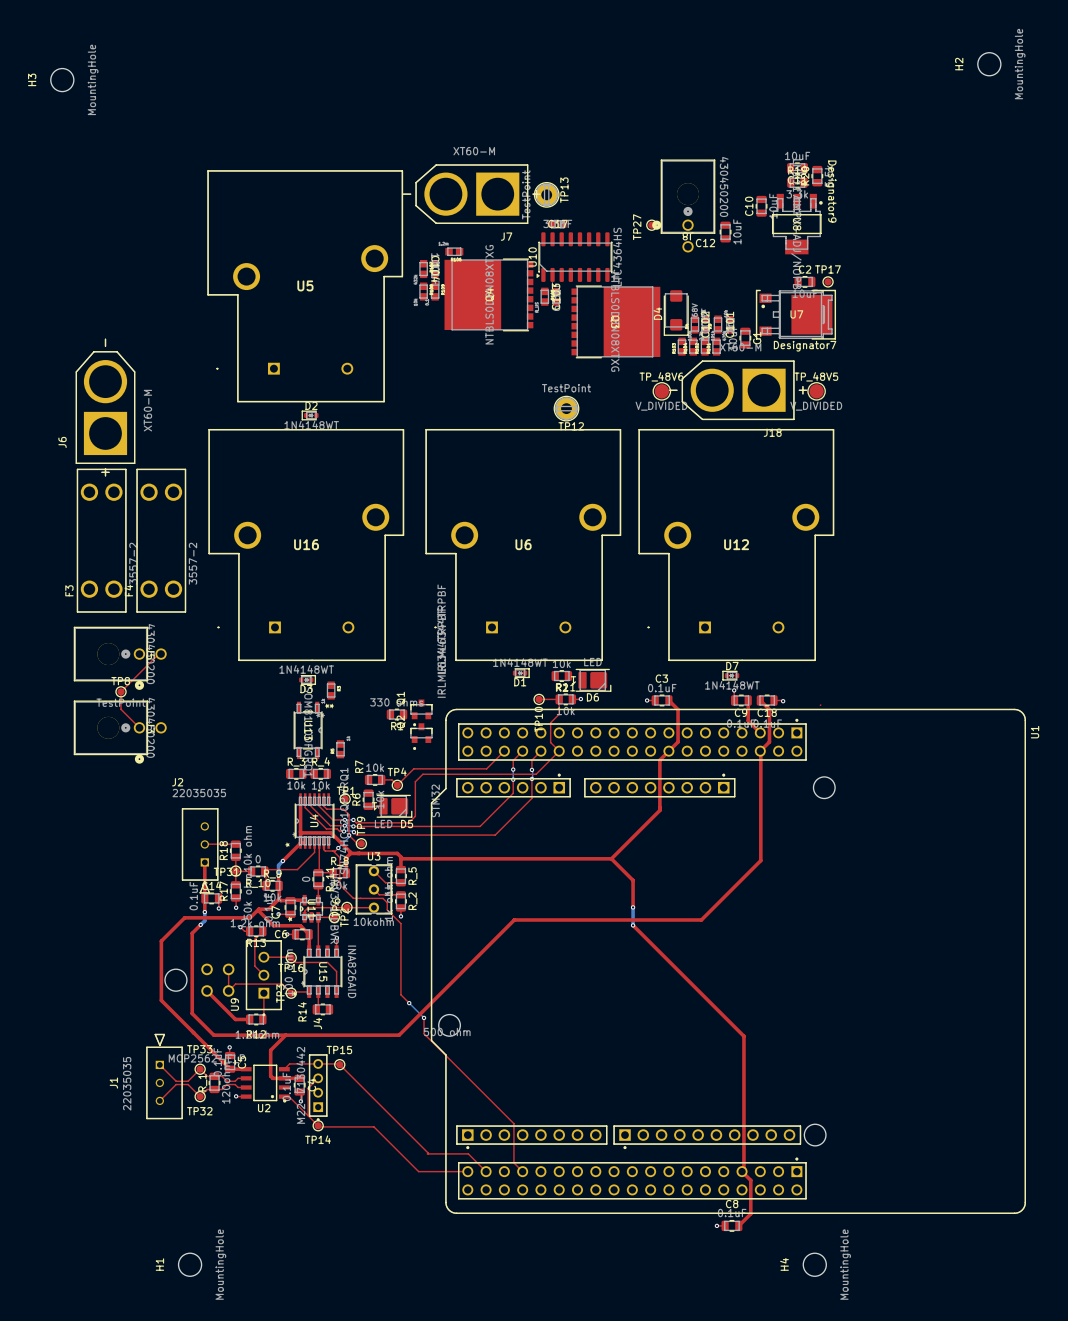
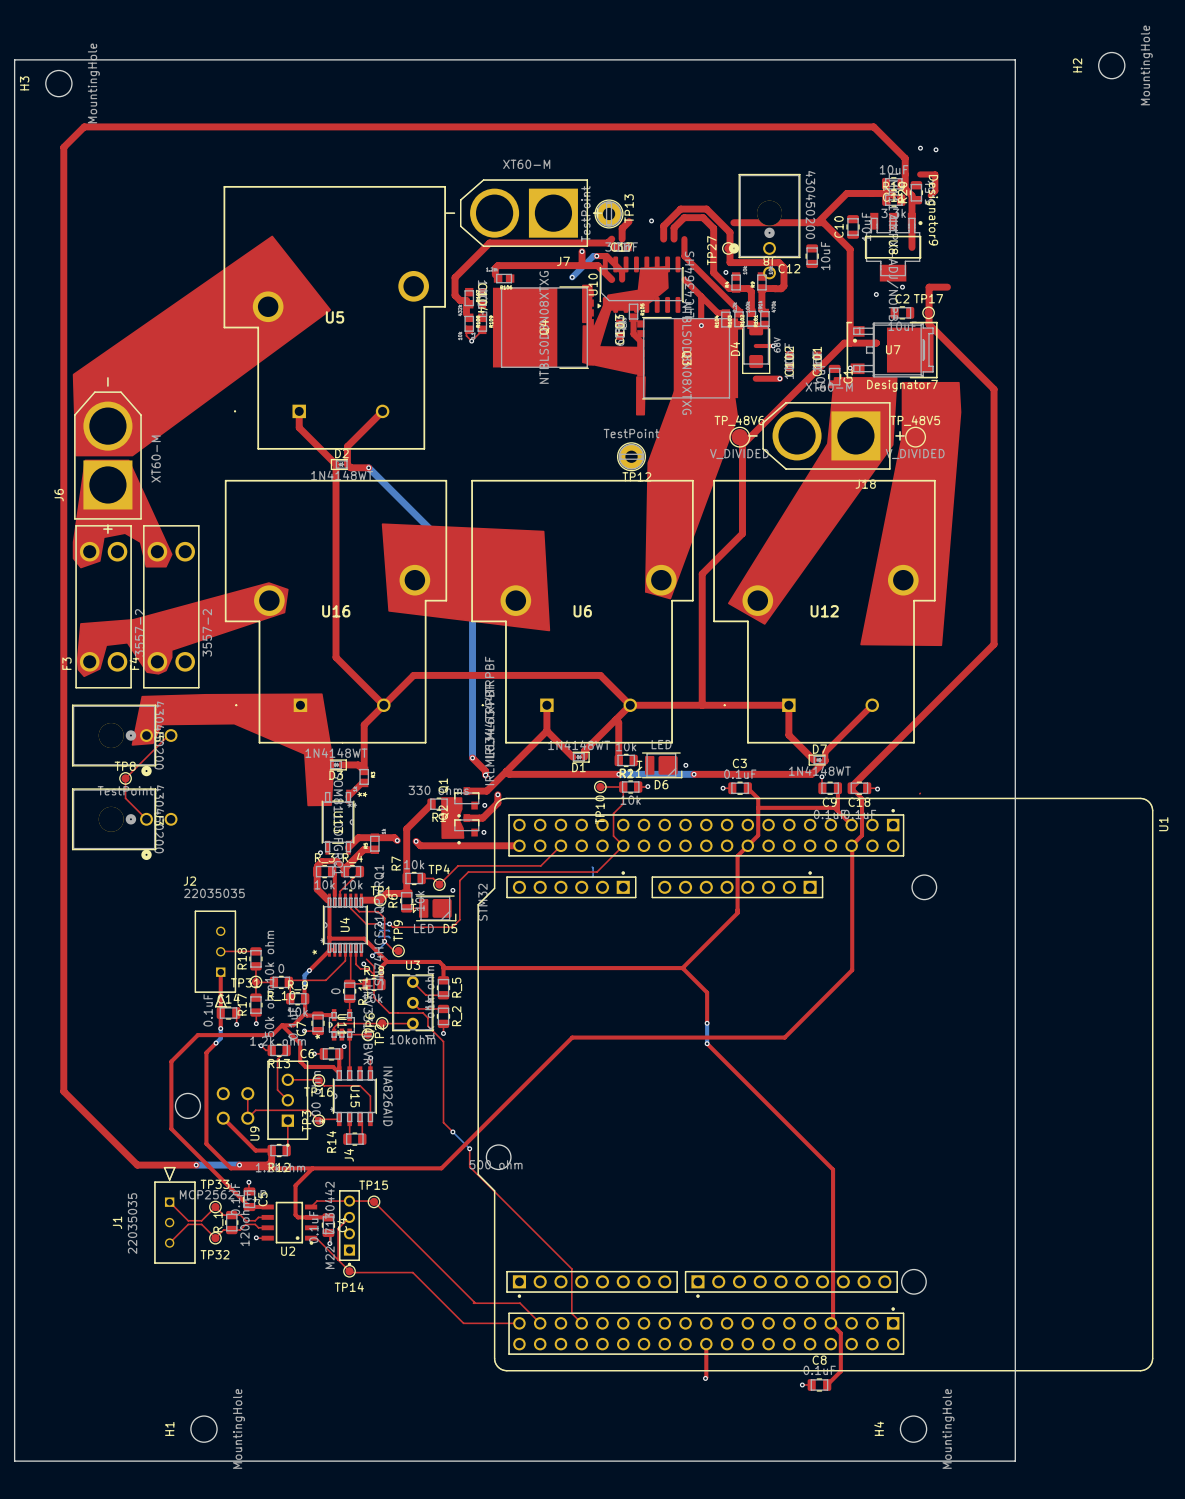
board edge: none -> (14, 59) (1015, 59) (1015, 1461) (14, 1461) (14, 59)
via: none -> (920, 148)
via: none -> (936, 149)
top track: none -> (920, 174) (935, 174) (935, 191) (930, 195)
top track: none -> (893, 195) (891, 193) (846, 193) (817, 222)
via: none -> (651, 220)
top track: none -> (629, 221) (622, 228) (622, 239)
top track: none -> (733, 222) (823, 222) (850, 249) (850, 343)
drawing: none -> [72, 235, 332, 569]
top track: none -> (611, 239) (607, 242) (489, 242) (455, 277) (455, 295) (460, 300) (466, 300) (466, 314)
top track: none -> (663, 239) (663, 226) (680, 209) (706, 209) (730, 232) (730, 262) (778, 262) (783, 267) (783, 286) (781, 288) (761, 288) (761, 309) (764, 313)
top track: none -> (674, 239) (674, 227) (684, 217) (703, 217) (713, 228) (713, 272) (729, 288) (748, 288)
top track: none -> (684, 239) (684, 256) (739, 310) (739, 313)
top track: none -> (911, 247) (911, 195) (905, 188) (905, 158) (873, 126) (84, 126) (63, 147) (63, 1091) (137, 1165) (196, 1165)
top track: none -> (582, 251) (582, 265)
via: none -> (582, 251)
top track: none -> (596, 256) (606, 256) (622, 271) (622, 279)
bottom track: none -> (596, 256) (593, 256) (572, 277)
via: none -> (596, 256)
drawing: none -> [582, 265, 962, 647]
via: none -> (725, 272)
top track: none -> (495, 274) (495, 268) (497, 265) (597, 265) (611, 279)
via: none -> (572, 277)
top track: none -> (684, 279) (717, 312) (723, 312)
via: none -> (902, 287)
top track: none -> (947, 287) (929, 287) (929, 324) (994, 389) (994, 644) (851, 788)
top track: none -> (748, 288) (751, 291) (751, 312)
via: none -> (876, 294)
top track: none -> (701, 296) (701, 325)
top track: none -> (633, 317) (633, 334) (640, 341)
top track: none -> (466, 326) (466, 335) (471, 341) (479, 333) (479, 326)
via: none -> (701, 325)
part position: (544, 296) -> (633, 311)
via: none -> (471, 341)
top track: none -> (876, 343) (844, 343) (742, 444) (742, 533) (702, 573) (702, 705)
top track: none -> (755, 345) (773, 345)
via: none -> (773, 345)
part position: (694, 324) -> (736, 282)
part position: (717, 324) -> (761, 282)
via: none -> (850, 368)
top track: none -> (755, 378) (779, 378)
via: none -> (779, 378)
part position: (682, 346) -> (739, 319)
part position: (693, 346) -> (725, 319)
part position: (705, 346) -> (751, 318)
part position: (716, 346) -> (764, 319)
top track: none -> (299, 411) (299, 427) (336, 464) (336, 657) (383, 705)
top track: none -> (382, 411) (347, 446) (347, 464) (350, 467) (368, 467)
bottom track: none -> (368, 467) (472, 571) (472, 757)
via: none -> (368, 467)
drawing: none -> [381, 523, 551, 632]
drawing: none -> [76, 582, 289, 678]
drawing: none -> [131, 693, 335, 807]
top track: none -> (546, 705) (546, 731)
top track: none -> (630, 705) (600, 675) (413, 675) (364, 724) (364, 770) (358, 764) (341, 764)
top track: none -> (630, 705) (584, 751) (584, 757)
top track: none -> (630, 705) (788, 705) (788, 735) (813, 760)
top track: none -> (872, 705) (825, 752) (825, 760) (811, 774) (694, 774)
top track: none -> (615, 719) (618, 722) (618, 760)
top track: none -> (546, 731) (486, 791) (466, 791)
top track: none -> (546, 731) (573, 757)
top track: none -> (472, 757) (485, 771) (485, 775)
via: none -> (472, 757)
via: none -> (685, 765)
top track: none -> (506, 771) (509, 774) (618, 774)
via: none -> (485, 775)
bottom track: none -> (618, 774) (694, 774)
via: none -> (618, 774)
via: none -> (694, 774)
top track: none -> (364, 782) (348, 796)
top track: none -> (497, 794) (497, 803) (482, 818) (466, 818)
via: none -> (497, 794)
drawing: none -> [441, 797, 465, 839]
top track: none -> (431, 804) (406, 829) (406, 893) (386, 893) (380, 900) (362, 900)
via: none -> (484, 805)
top track: none -> (758, 807) (834, 807) (837, 811)
via: none -> (483, 832)
top track: none -> (397, 840) (394, 837) (358, 837) (348, 847)
via: none -> (397, 840)
top track: none -> (416, 841) (420, 845) (519, 845)
via: none -> (416, 841)
top track: (522, 751) (513, 760) (513, 769) -> none
top track: (540, 751) (531, 760) (531, 769) -> none
top track: none -> (374, 849) (363, 849) (344, 868) (344, 871) (344, 869) (337, 861) (321, 861) (317, 865) (317, 889) (328, 900)
via: none -> (320, 852)
bottom track: (513, 769) (513, 779) -> none
via: (513, 769) -> none
via: (531, 769) -> none
top track: none -> (332, 871) (334, 874) (334, 895)
top track: none -> (359, 871) (340, 891) (340, 896)
top track: (531, 778) (531, 798) (495, 835) (356, 835) (353, 832) -> none
via: (531, 778) -> none
top track: (513, 779) (513, 793) (480, 826) (353, 826) -> none
via: (513, 779) -> none
via: none -> (452, 890)
top track: (305, 799) (305, 807) (326, 828) (337, 828) (344, 831) -> none
top track: (309, 799) (309, 805) (330, 825) (344, 825) -> none
via: (344, 825) -> none
via: (353, 826) -> none
via: (344, 831) -> none
via: (353, 832) -> none
top track: (338, 848) (335, 850) (323, 849) -> (374, 974) (368, 968) (360, 968) (356, 964) (356, 957)
via: none -> (363, 963)
top track: (258, 909) (273, 925) (300, 925) (309, 934) (309, 939) -> (282, 1025) (300, 1043) (300, 1061) (305, 1066) (333, 1066) (339, 1073)
via: none -> (344, 1046)
top track: none -> (360, 1119) (362, 1121) (362, 1139)
top track: none -> (271, 1150) (271, 1161) (268, 1165) (239, 1165)
bottom track: none -> (196, 1165) (239, 1165)
via: none -> (196, 1165)
via: none -> (239, 1165)
top track: none -> (706, 1344) (705, 1378)
via: none -> (705, 1378)

